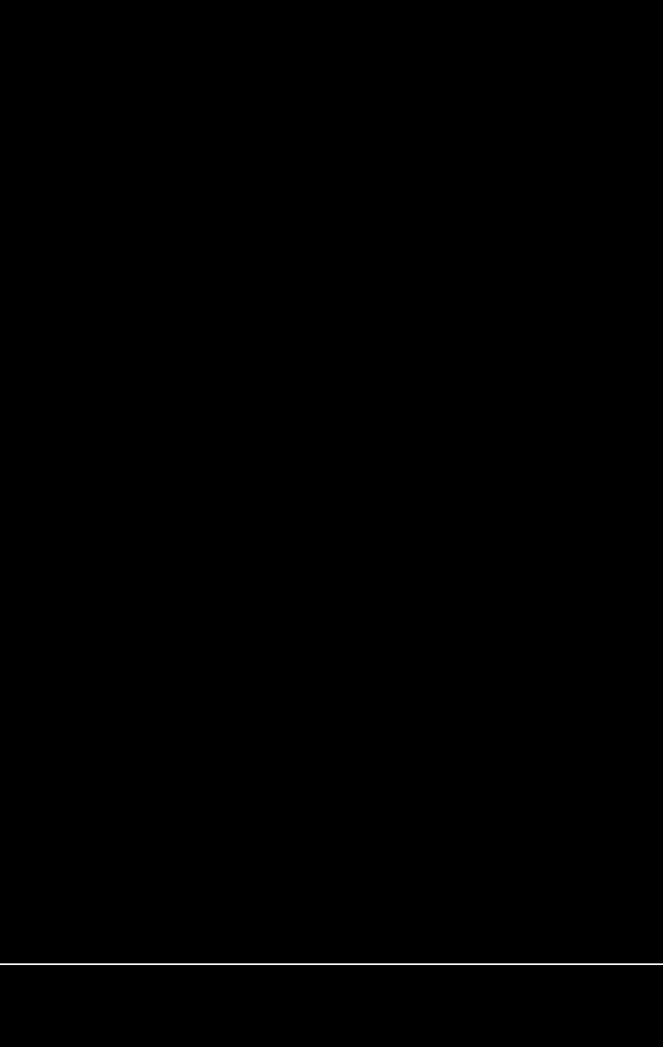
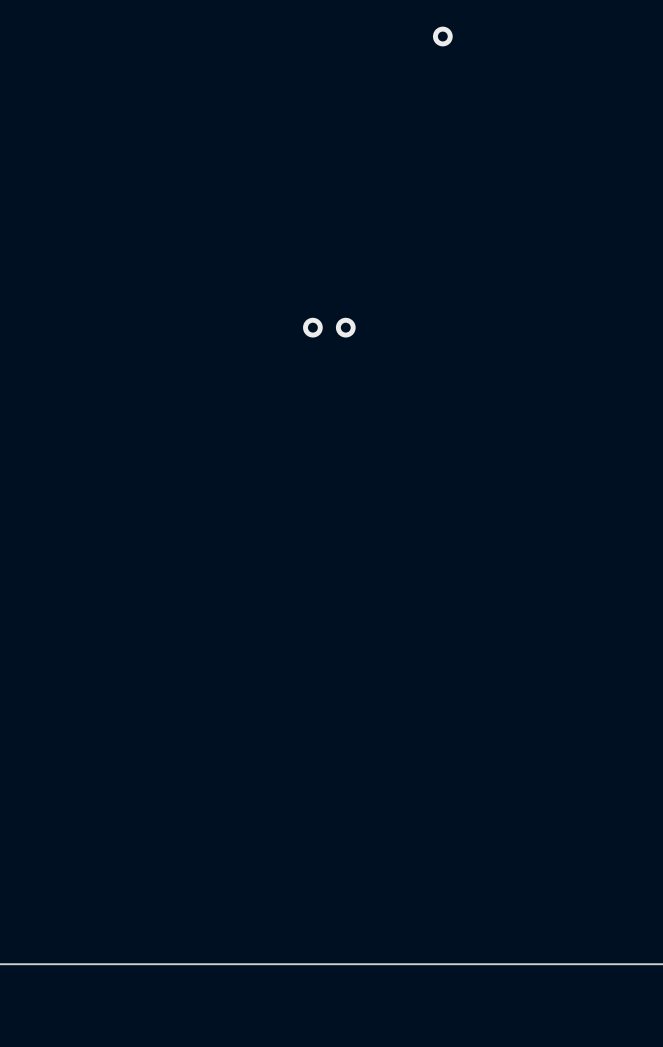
via: none -> (442, 36)
via: none -> (312, 327)
via: none -> (345, 327)

